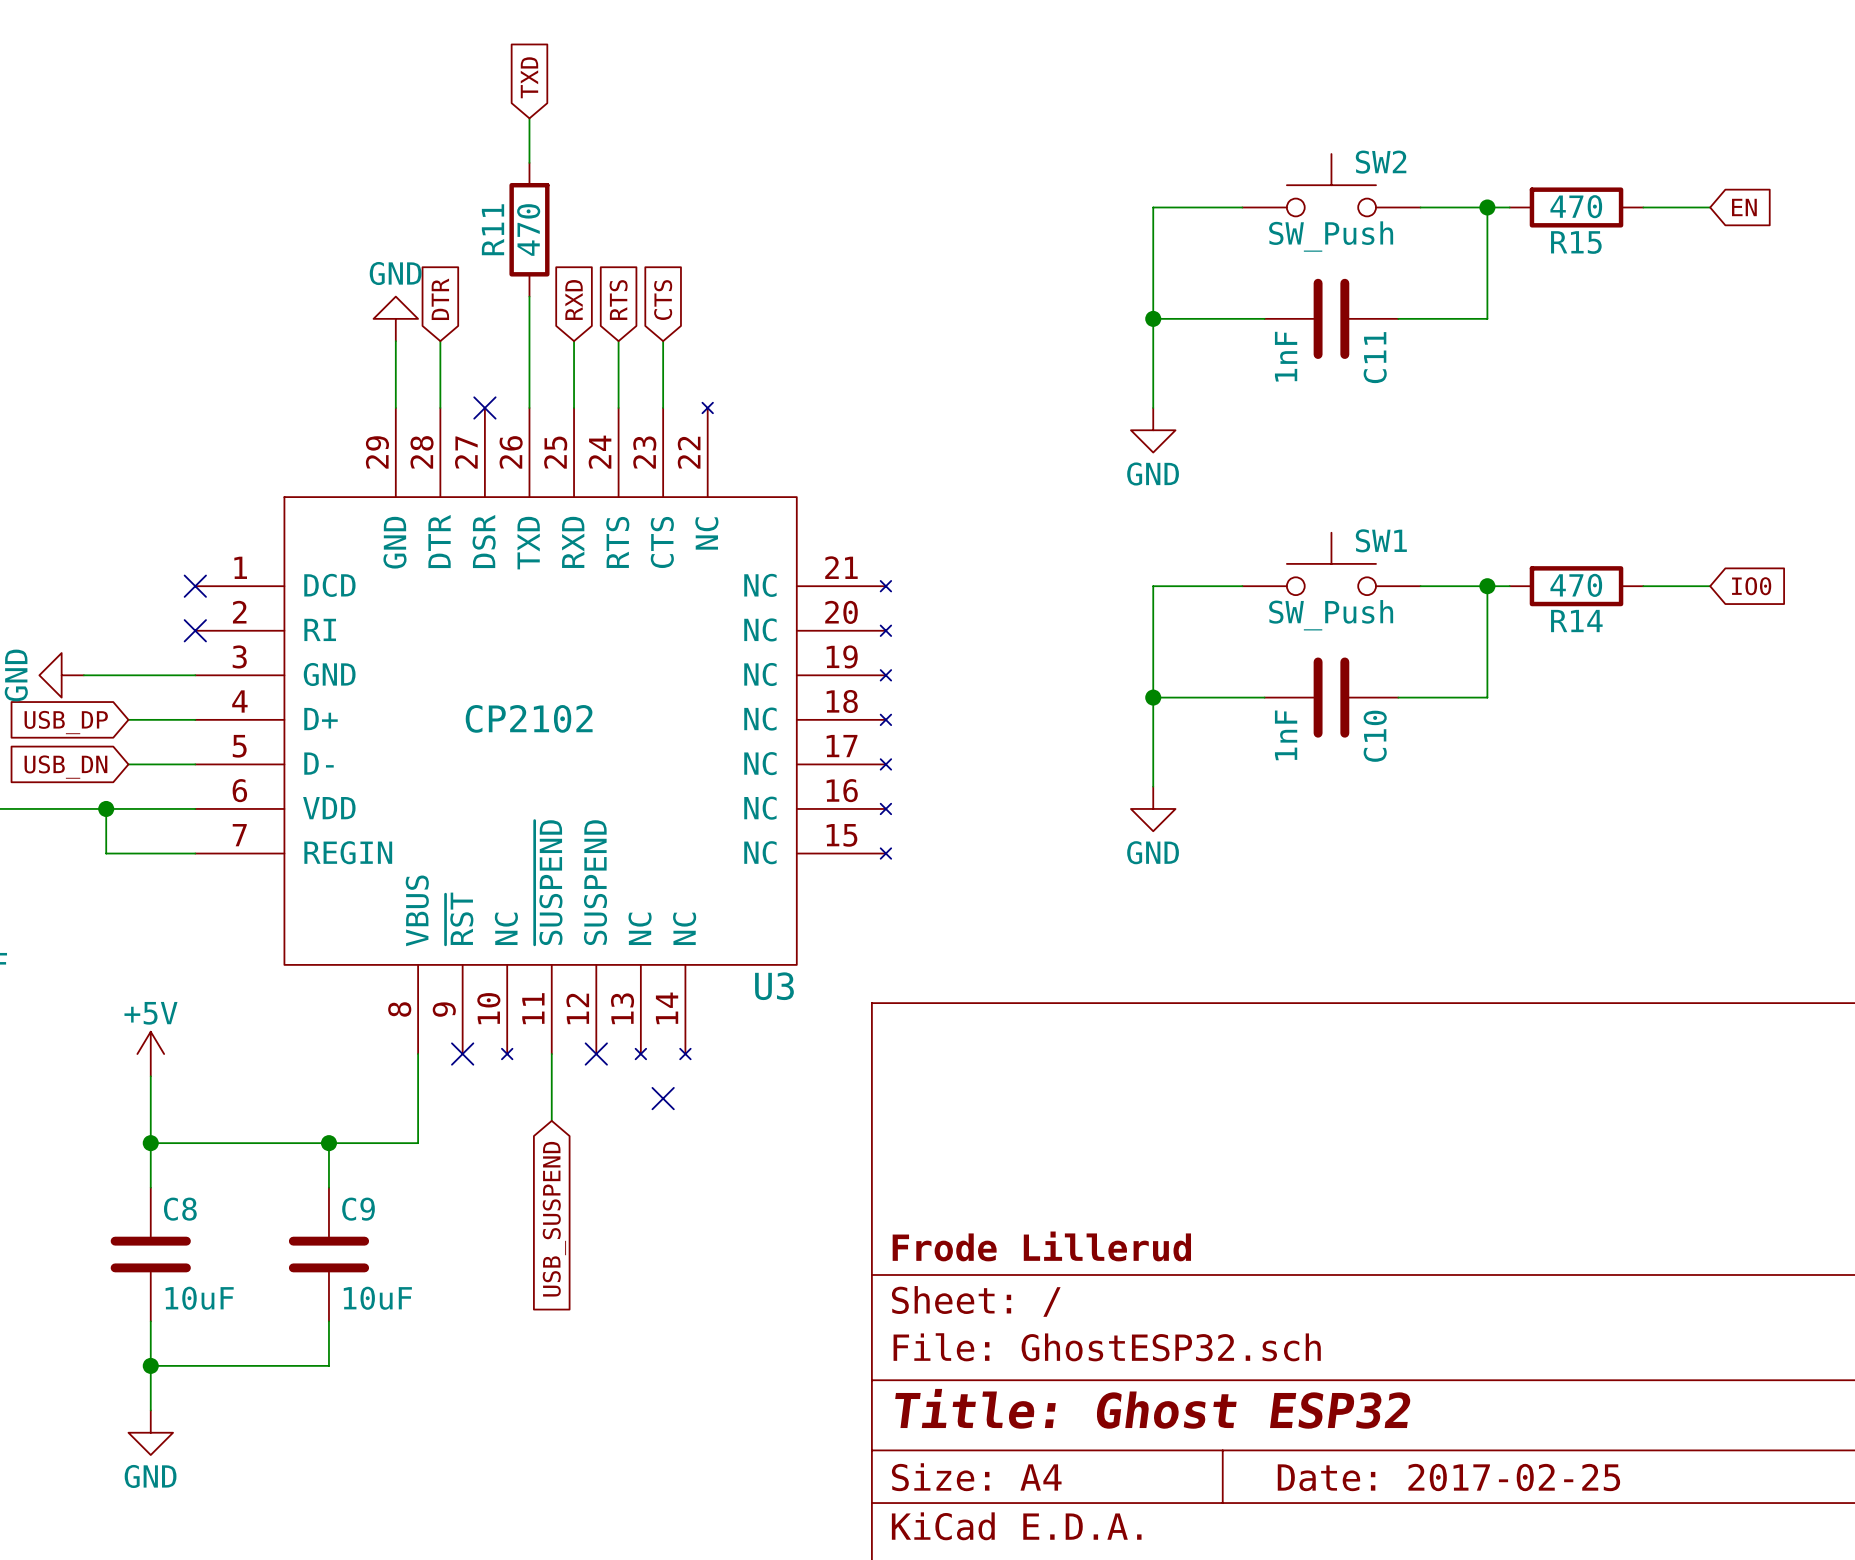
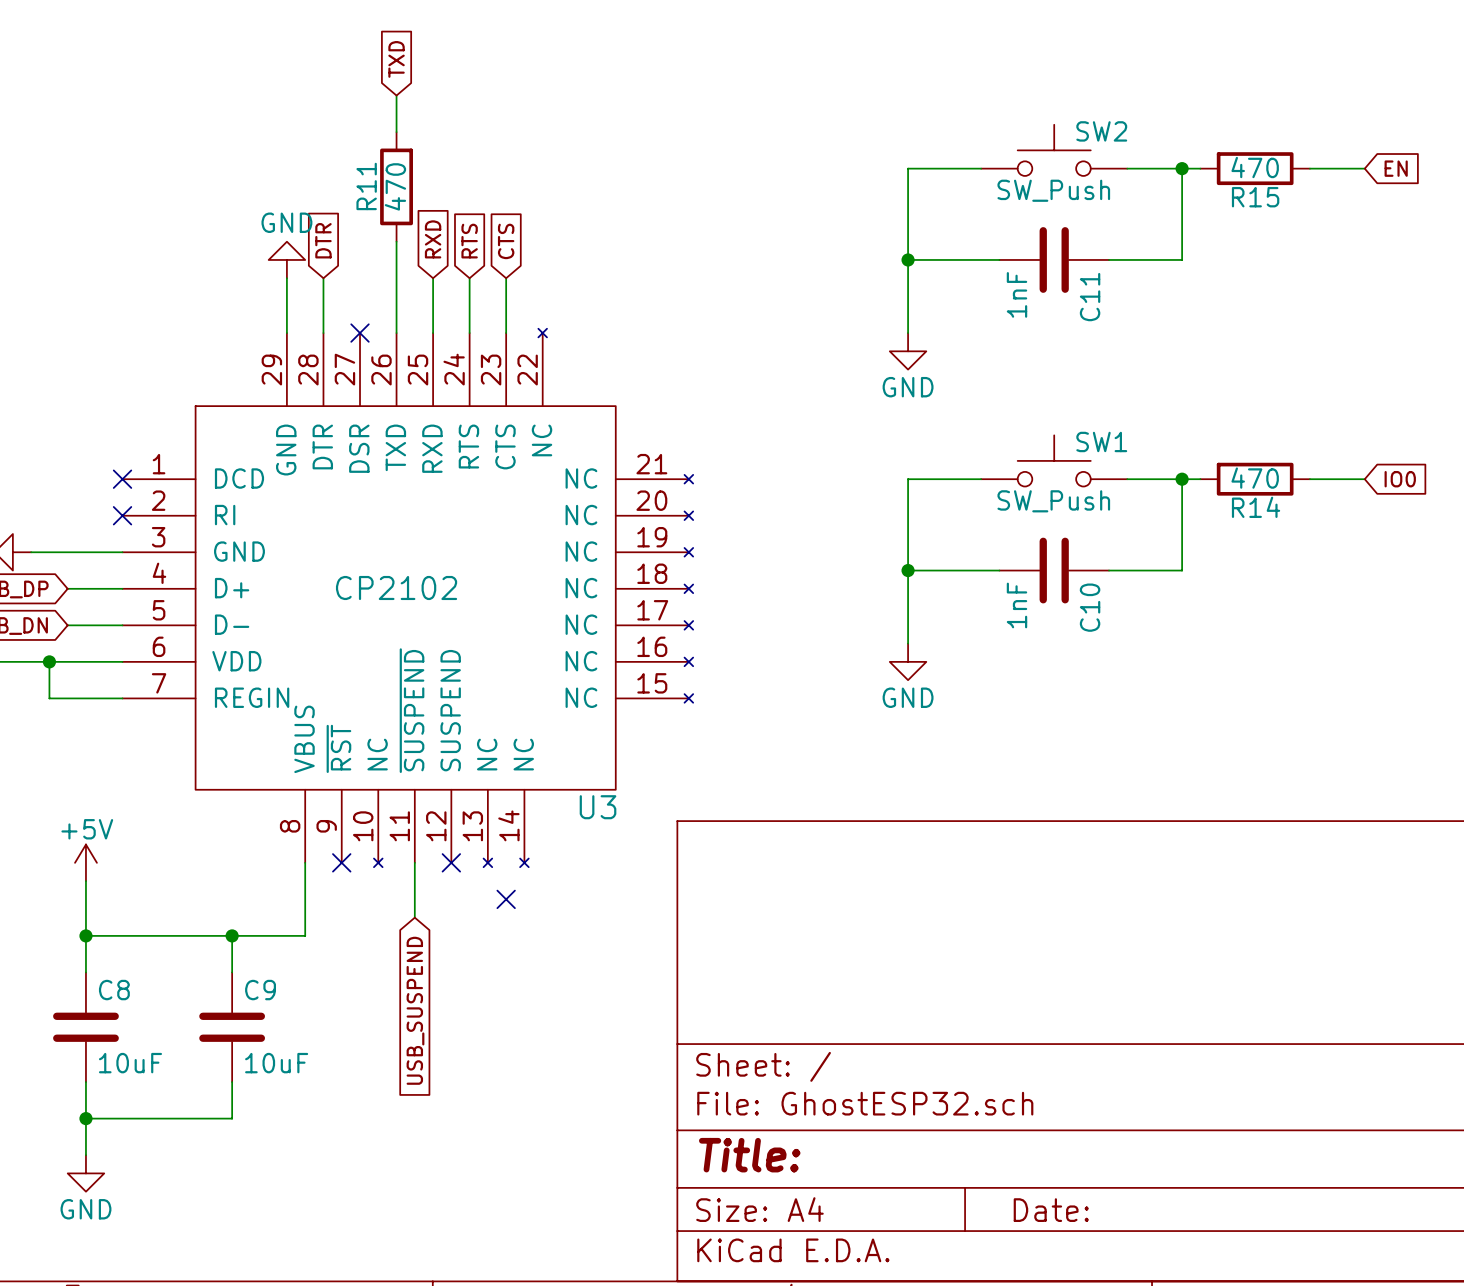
title block: Frode Lillerud (1041, 1246) -> none
title block: Title: Ghost ESP32 (1152, 1408) -> Title: (749, 1155)
title block: Date: 2017-02-25 (1448, 1477) -> Date: (1051, 1210)

